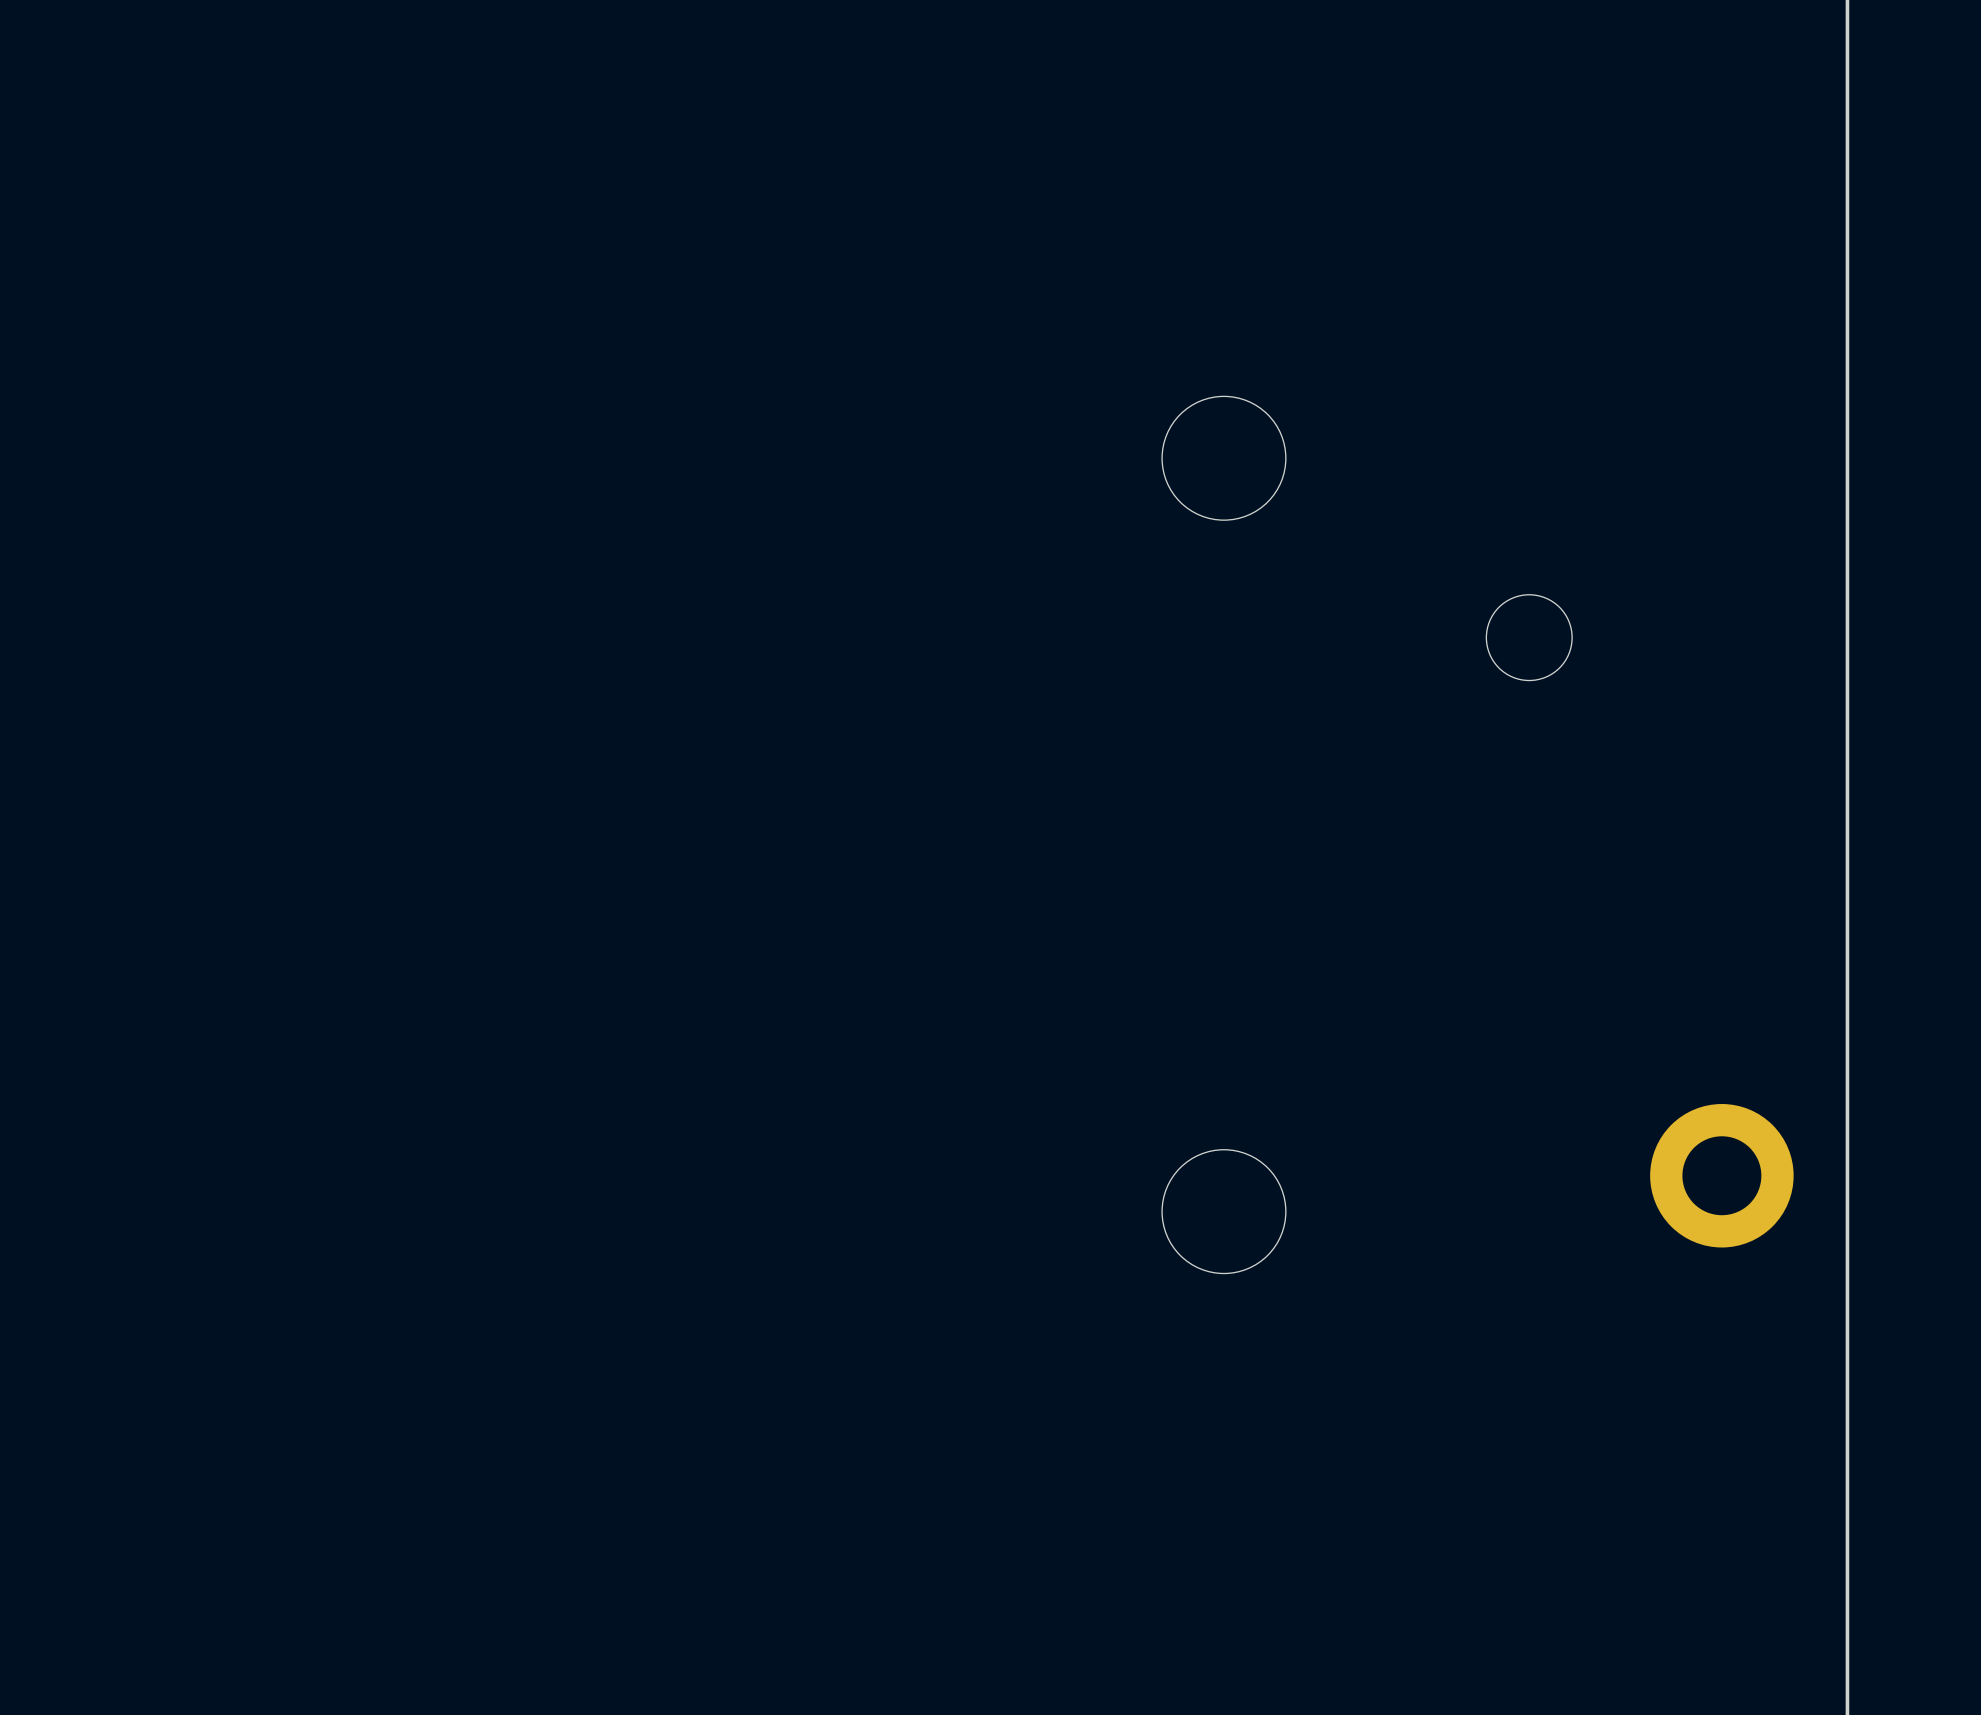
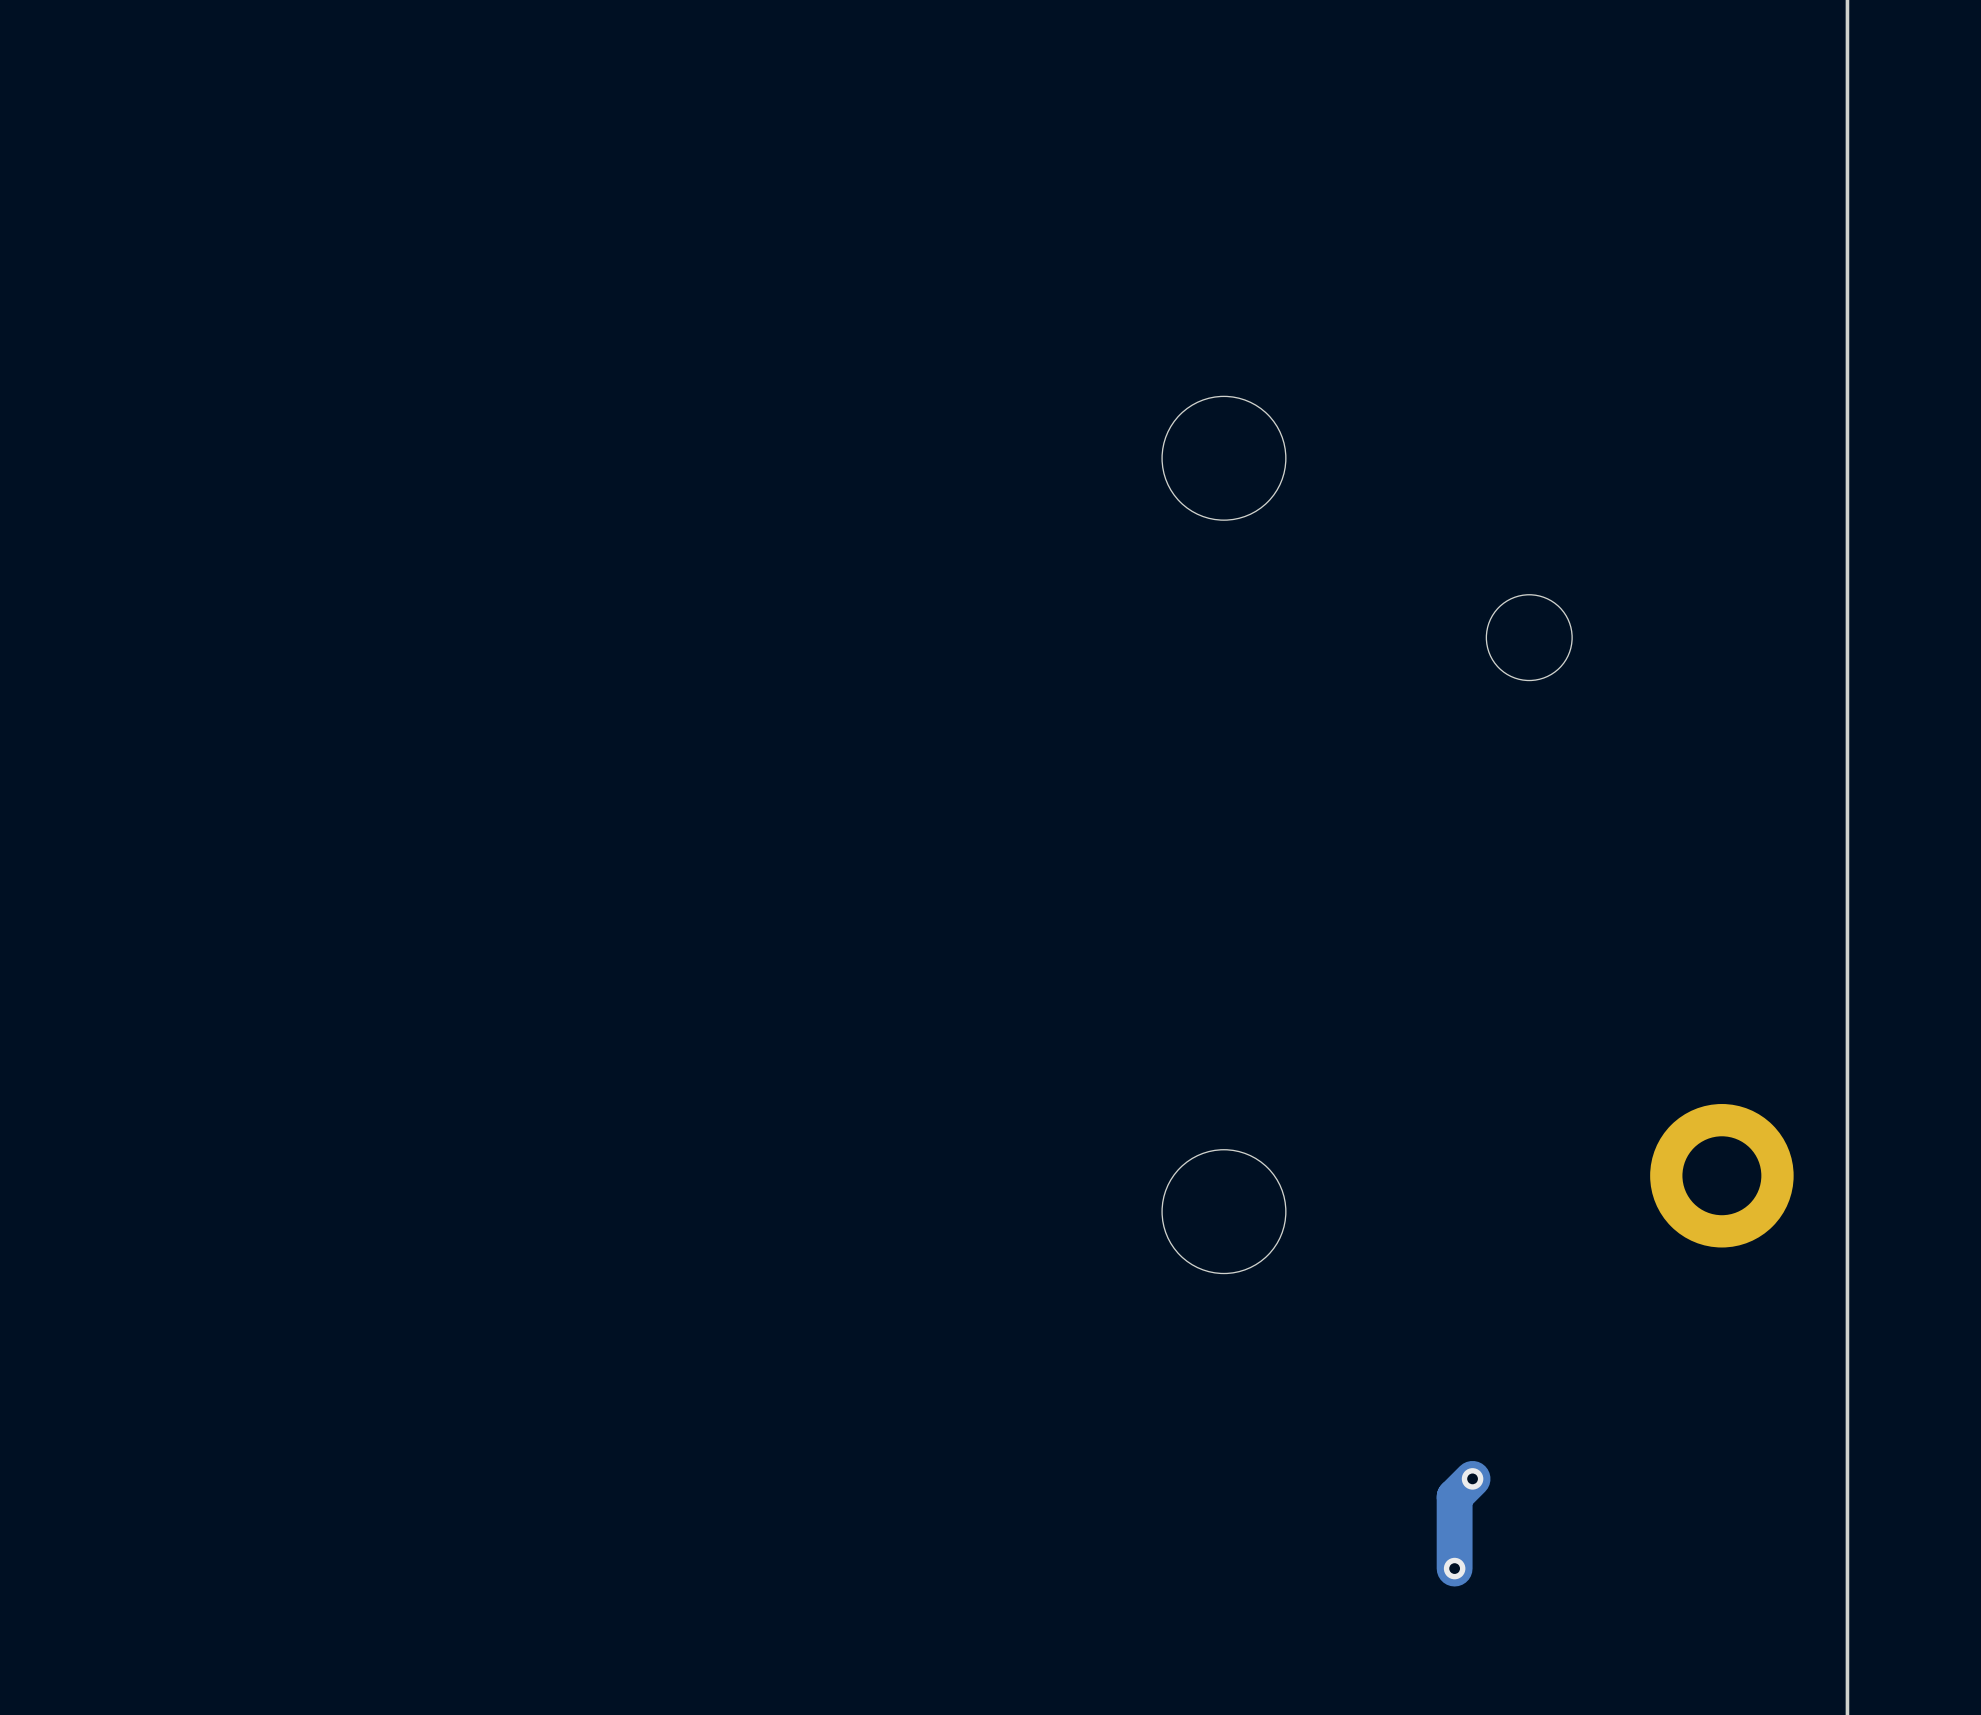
track: none -> (1472, 1478) (1454, 1496) (1454, 1568)
via: none -> (1472, 1478)
via: none -> (1454, 1568)

